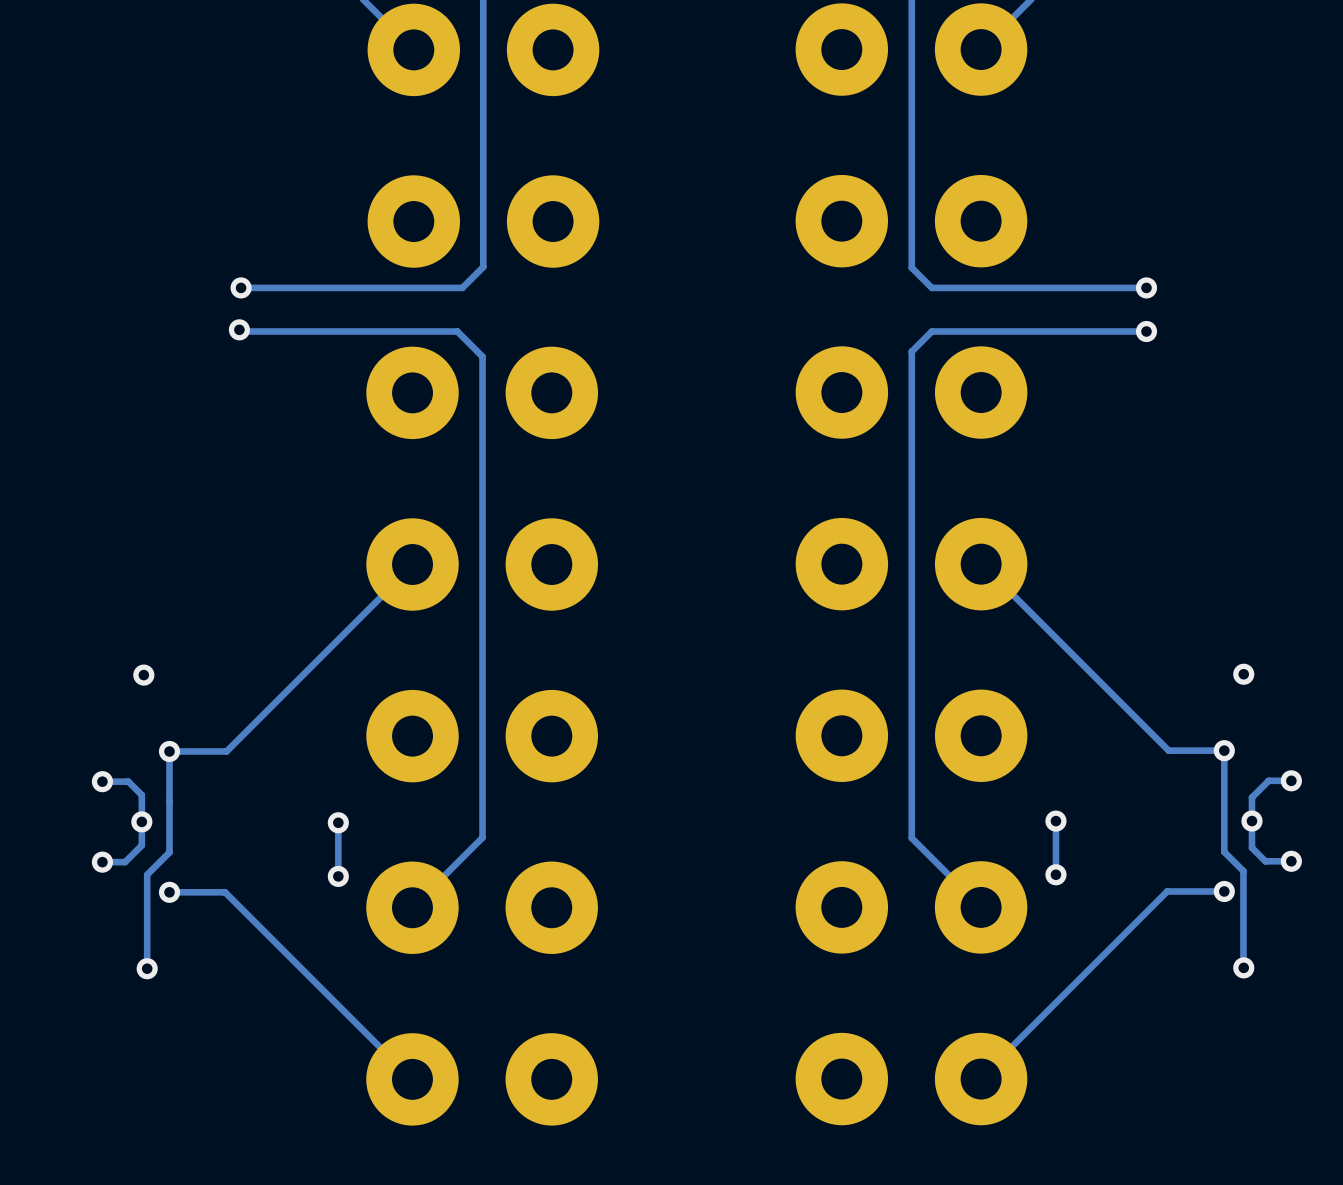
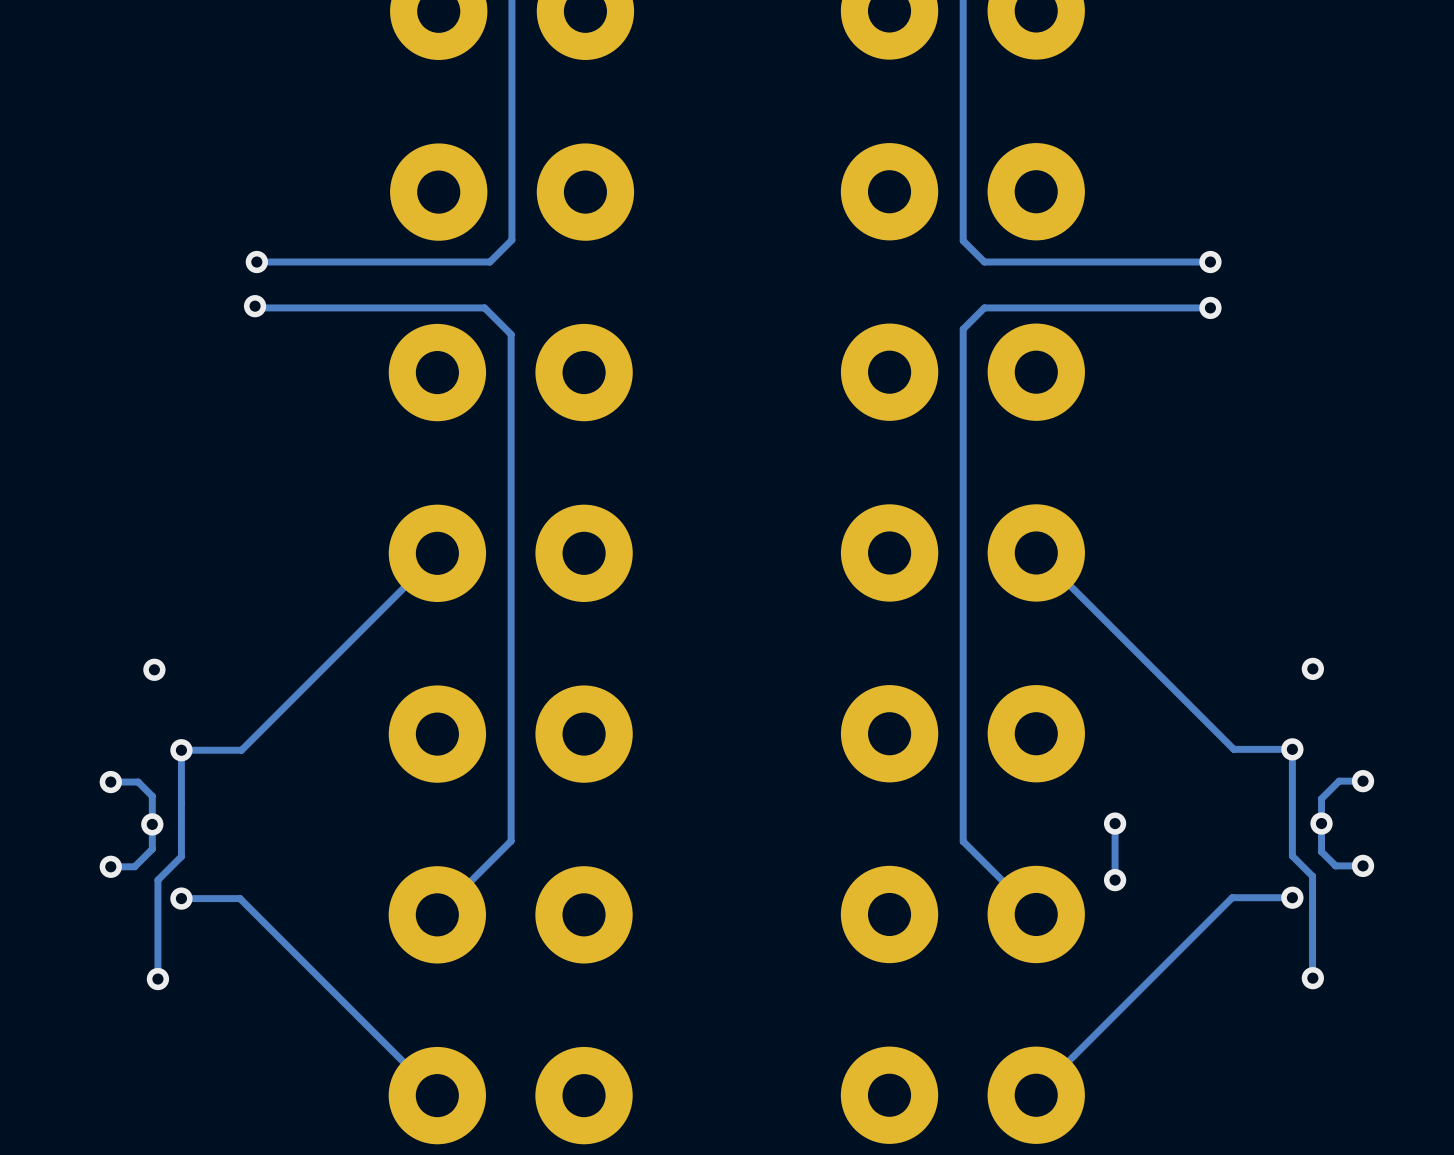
track: (338, 822) (338, 876) -> none
via: (338, 822) -> none
via: (338, 876) -> none

